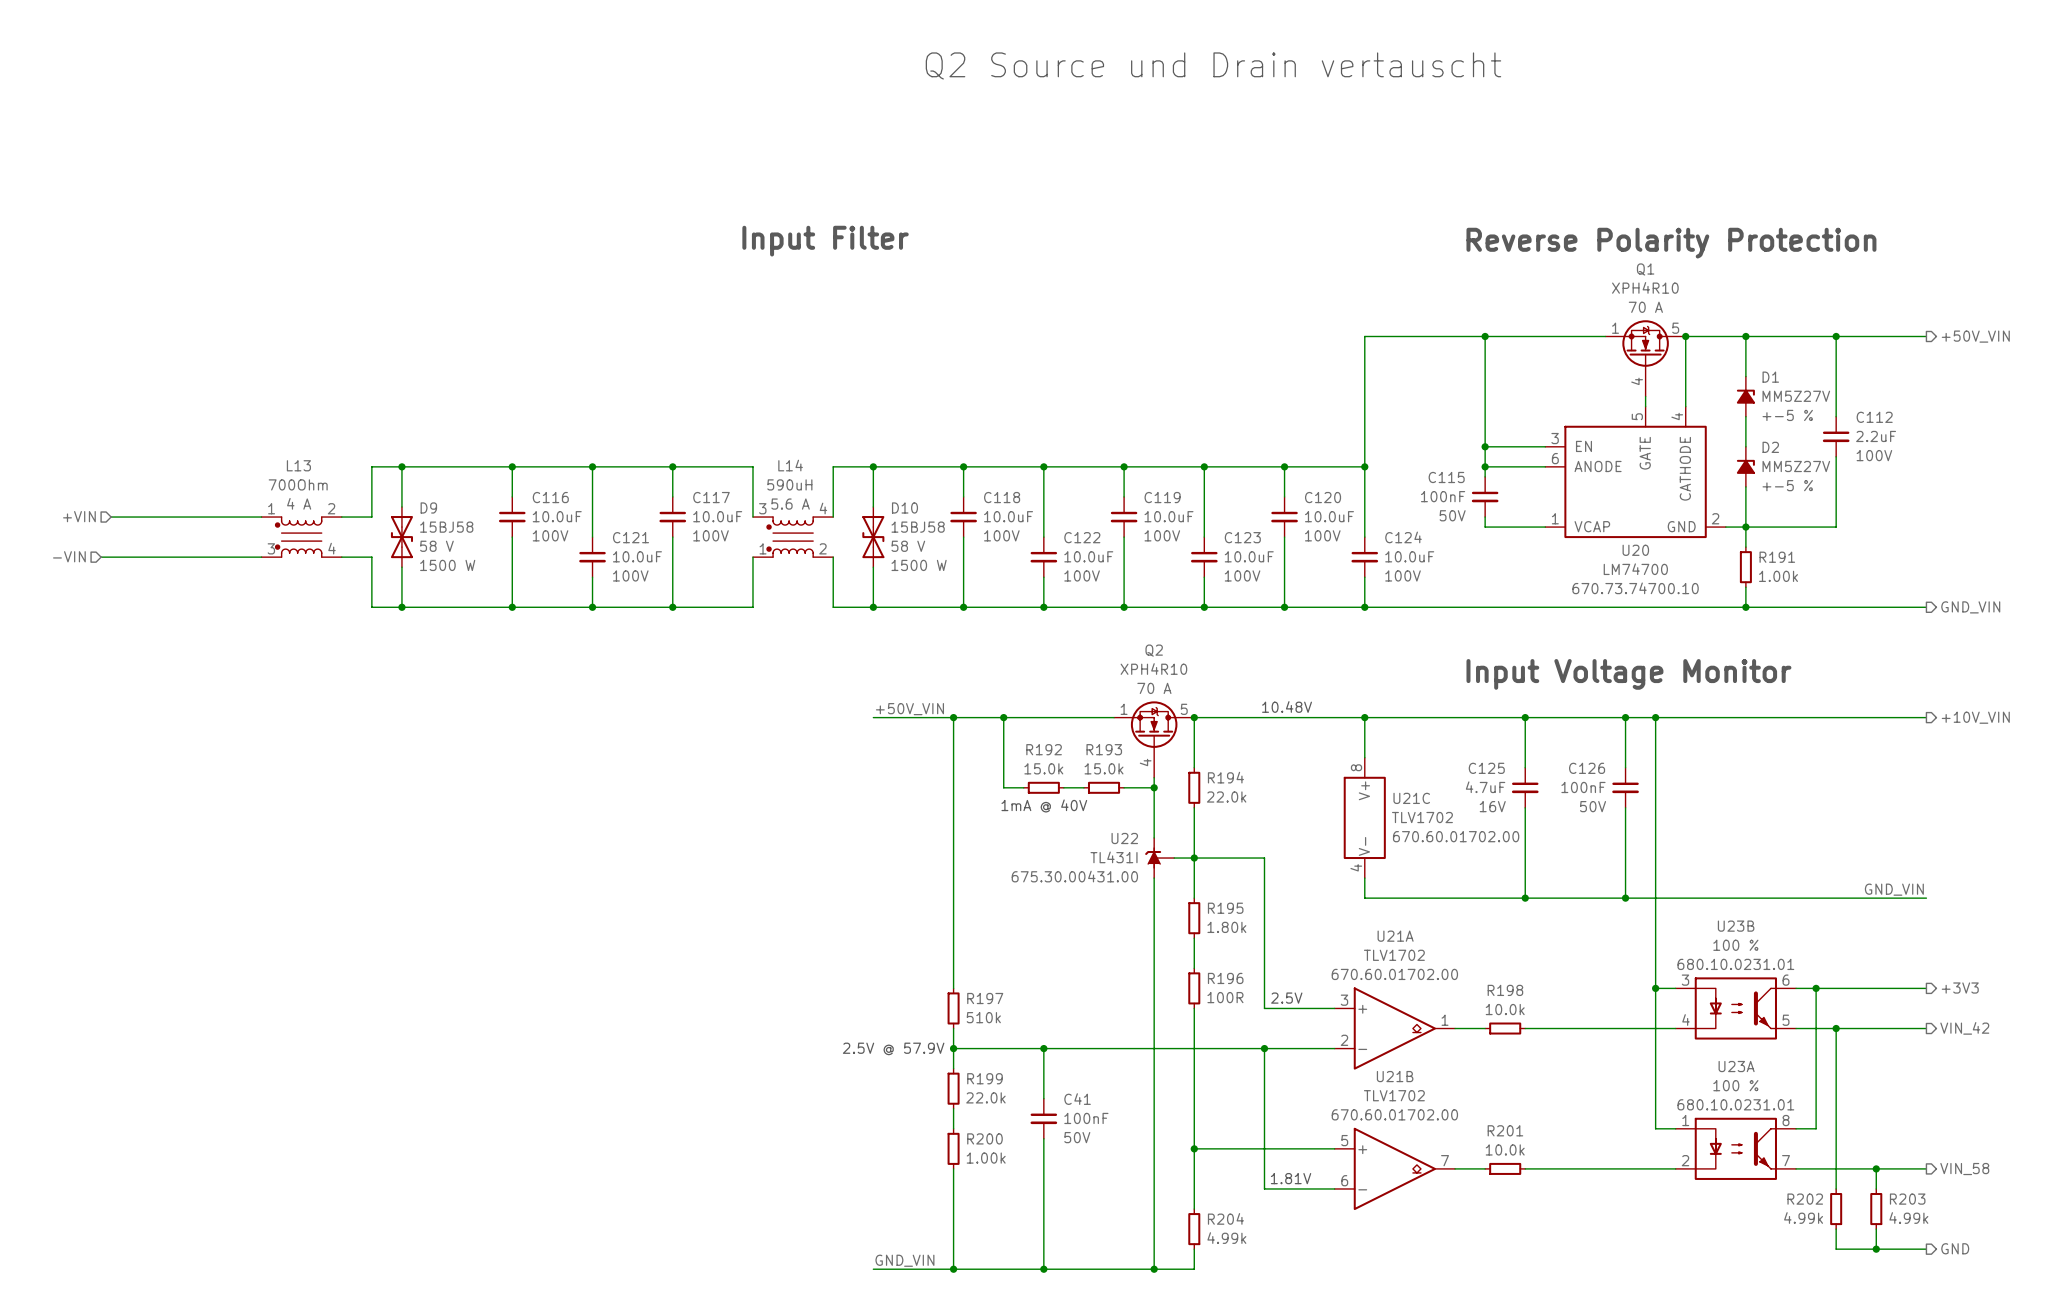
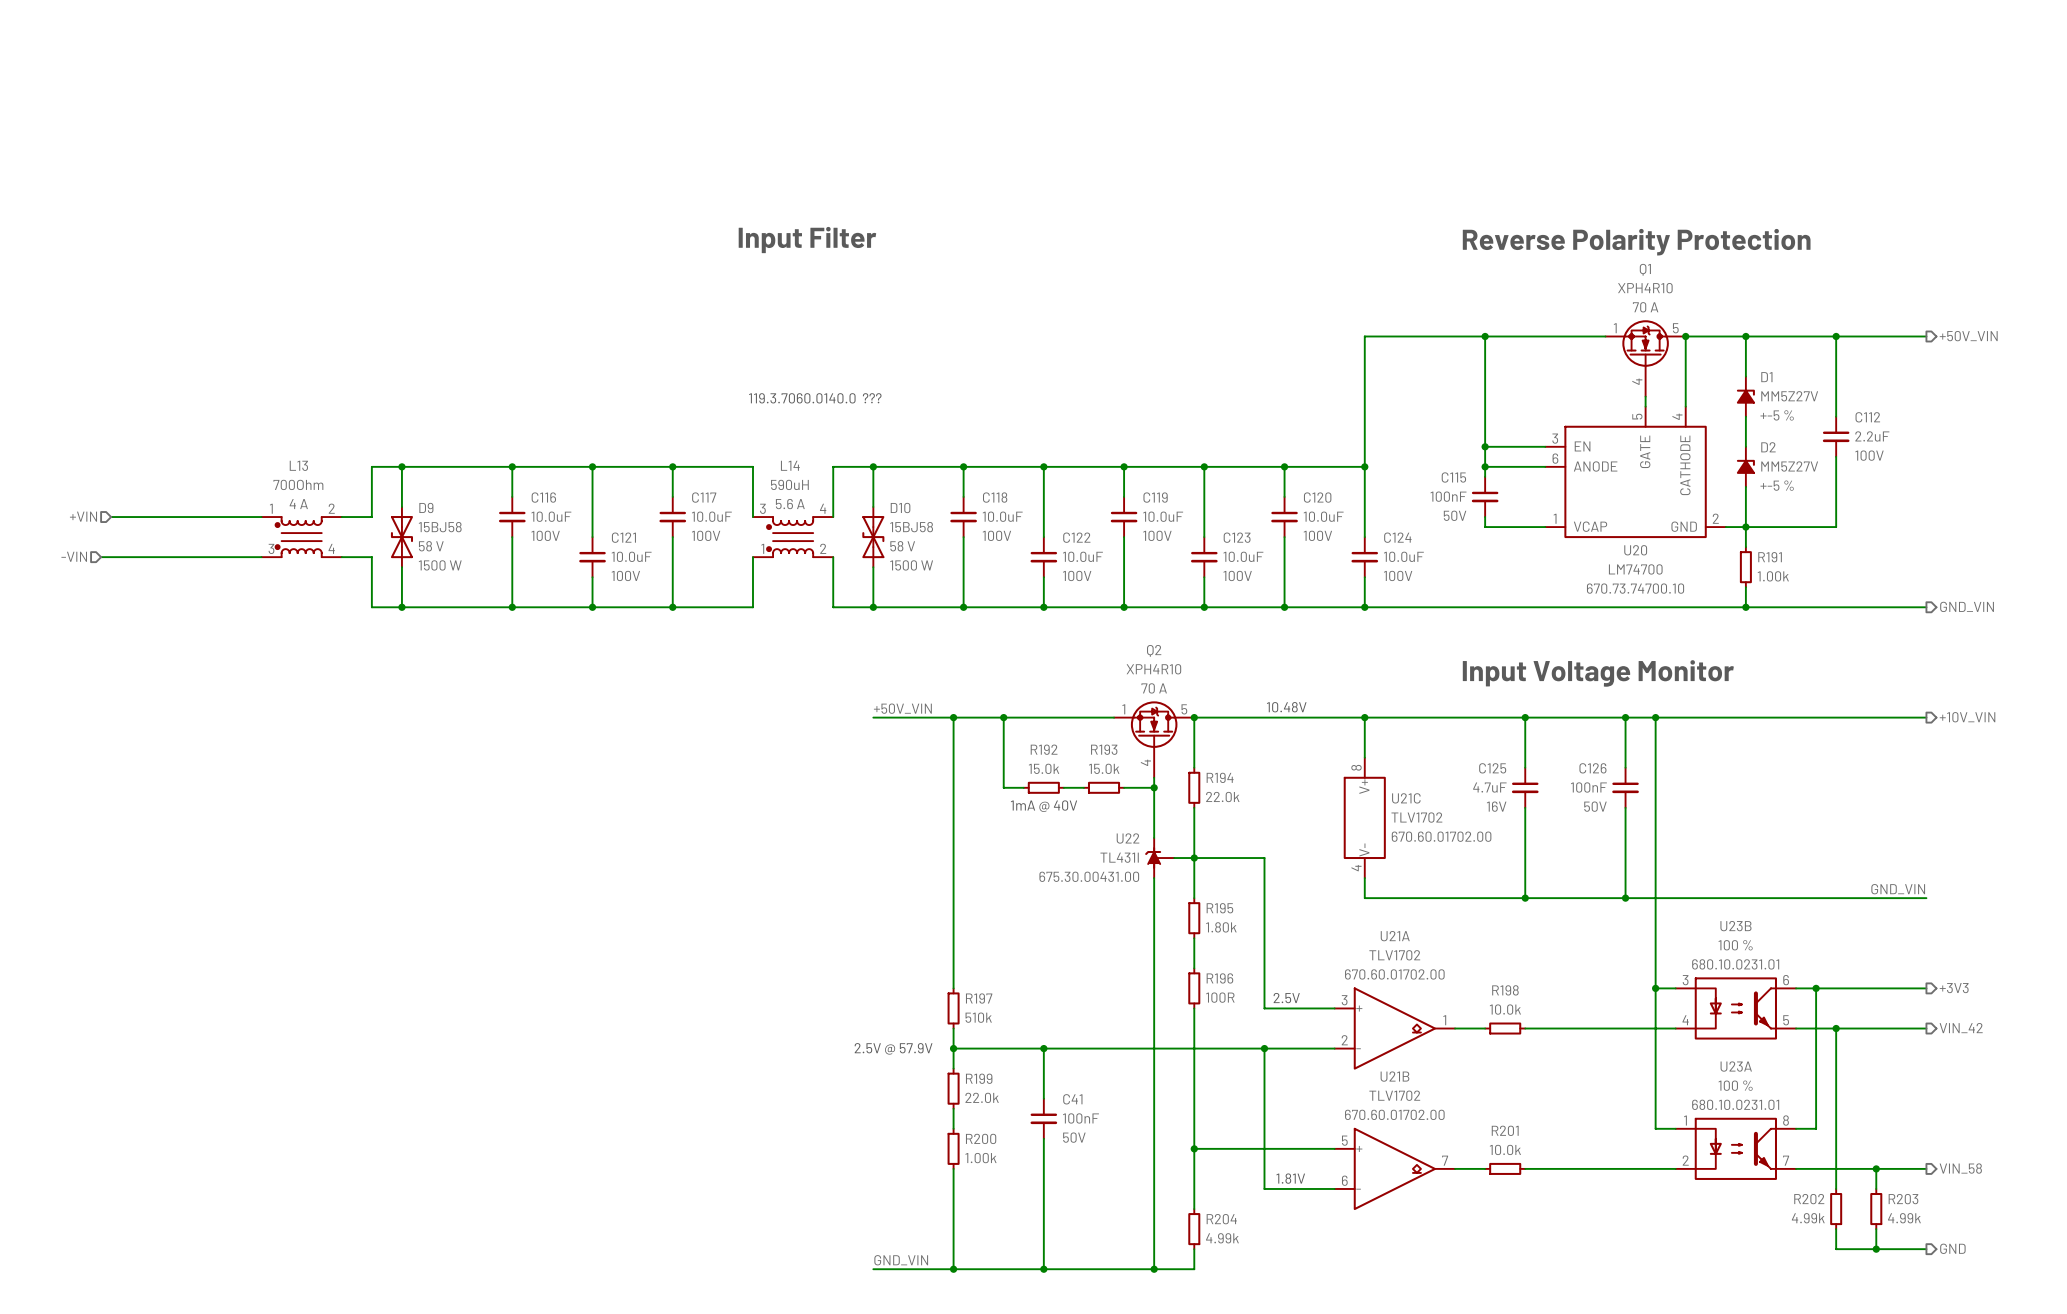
text: Q2 Source und Drain vertauscht (1213, 65) -> none
text: none -> 119.3.7060.0140.0 ??? (815, 398)

